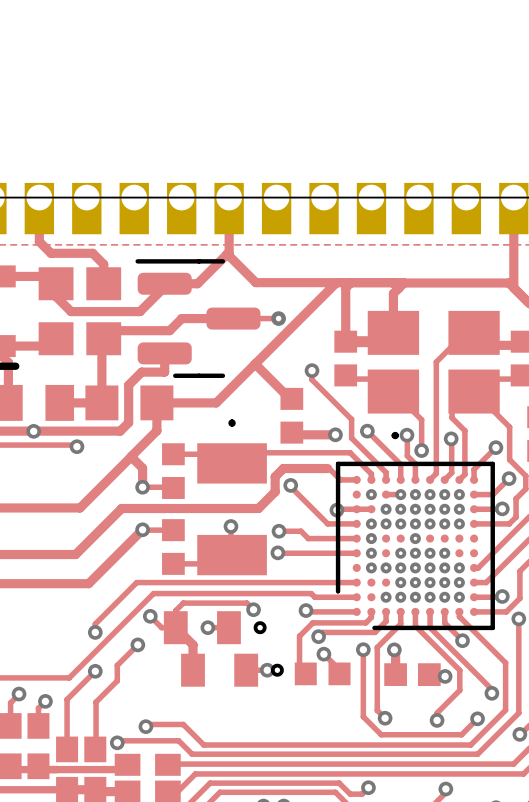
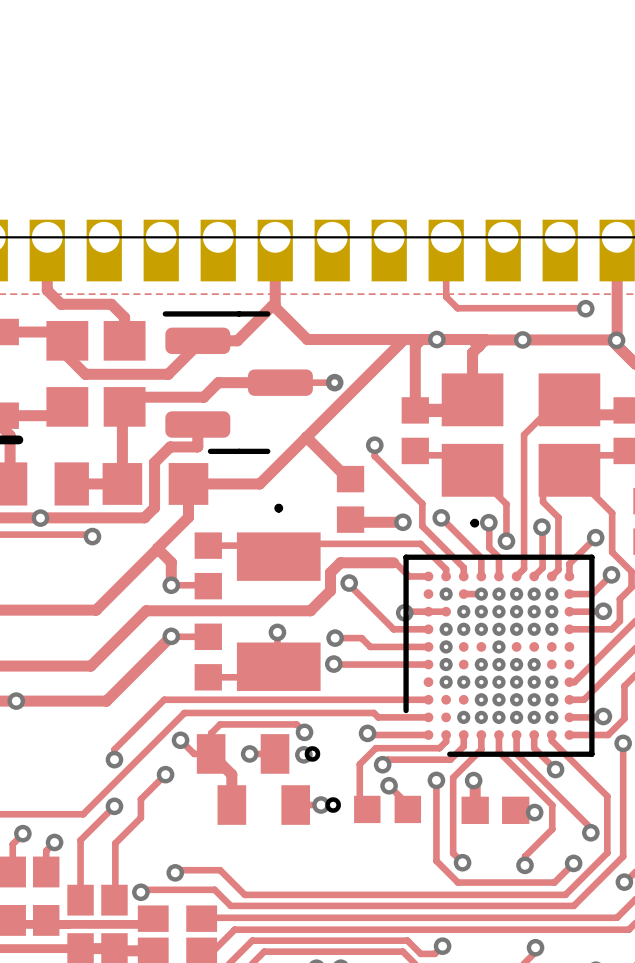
track: none -> (446, 245) (446, 296) (457, 308) (585, 308)
via: none -> (585, 308)
via: none -> (436, 339)
via: none -> (522, 339)
via: none -> (616, 340)
via: none -> (16, 701)
via: none -> (303, 754)

